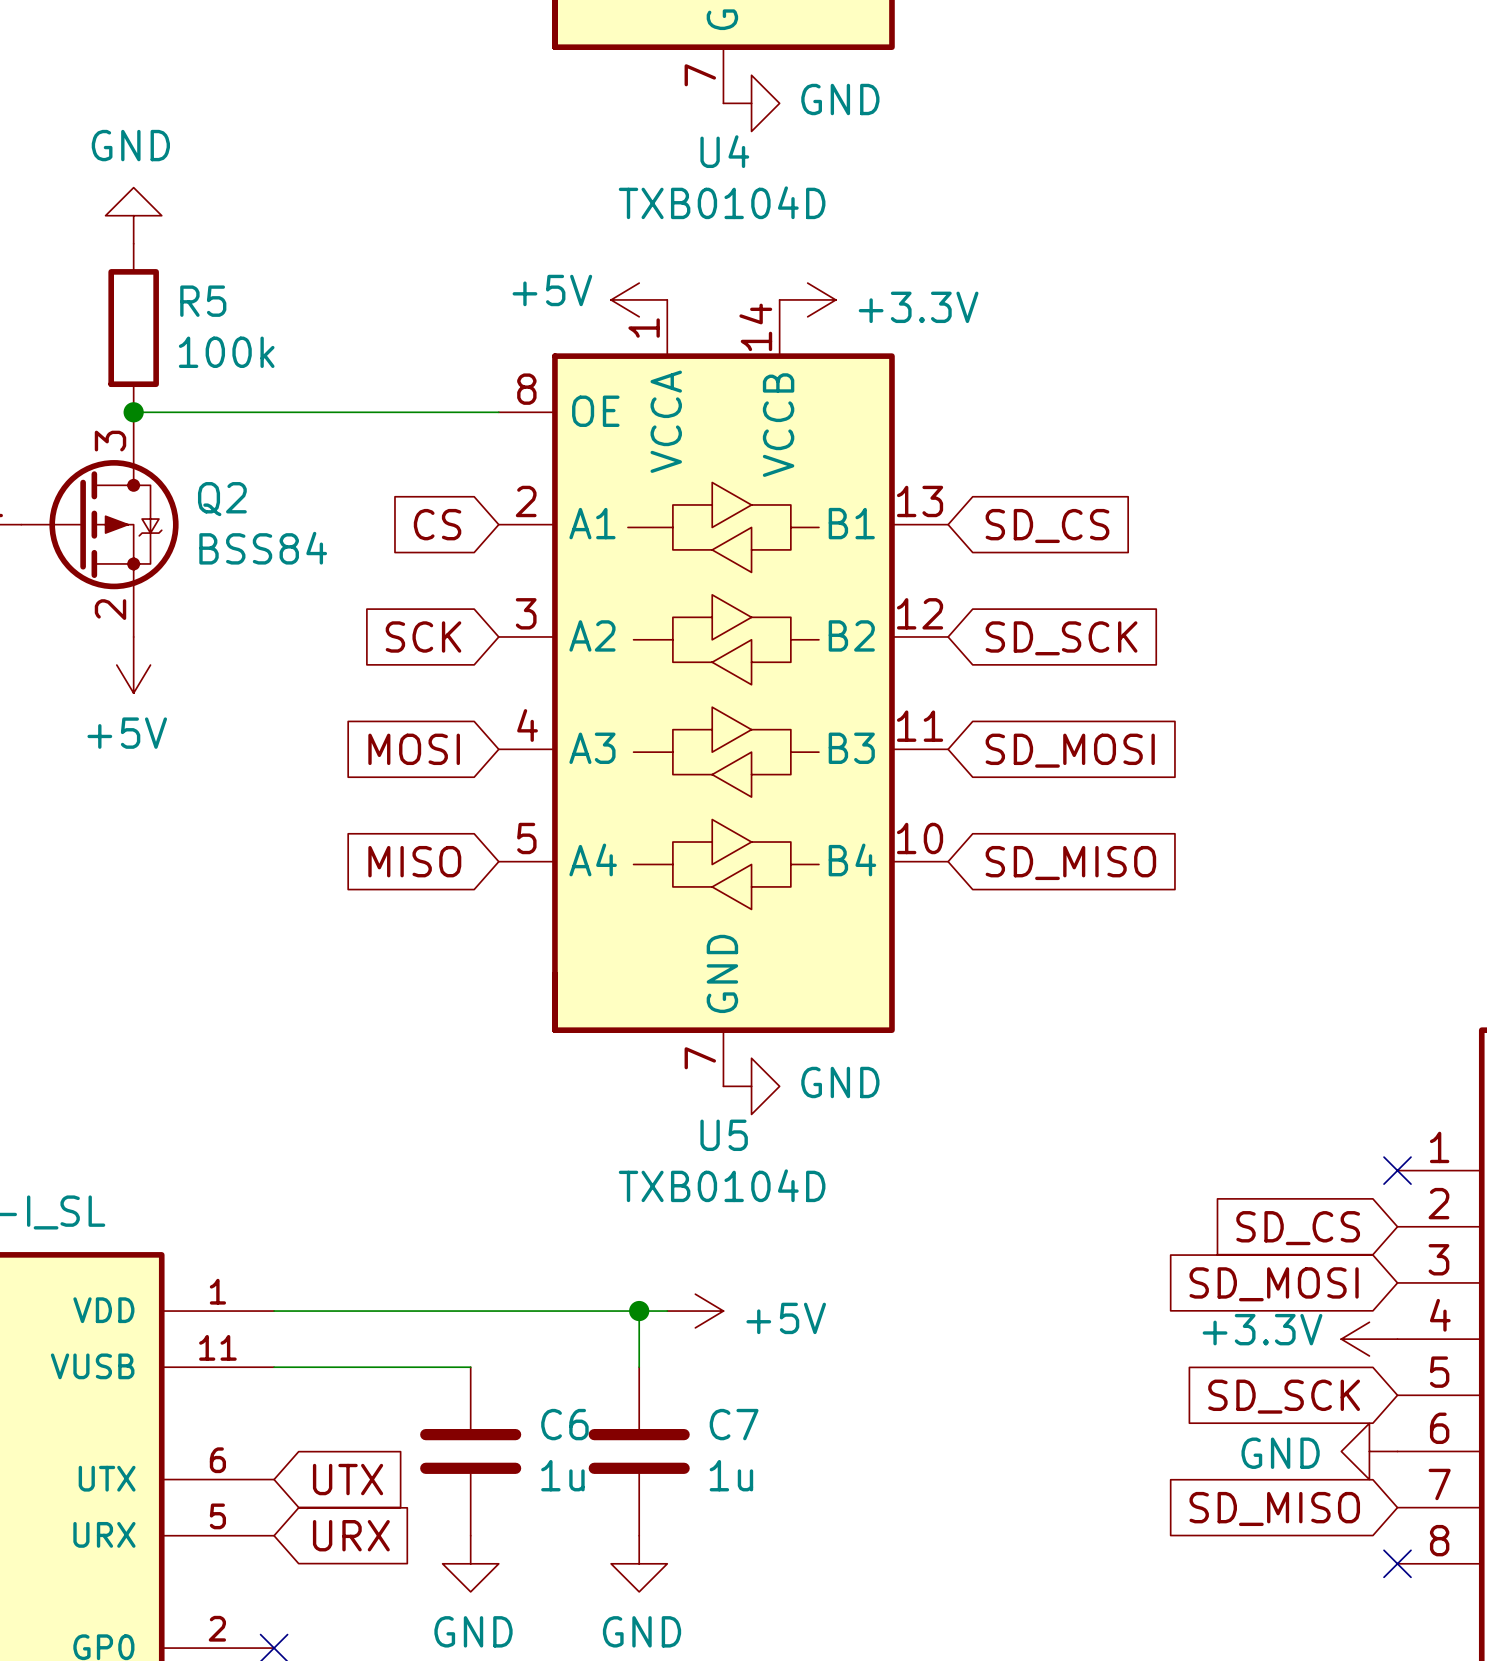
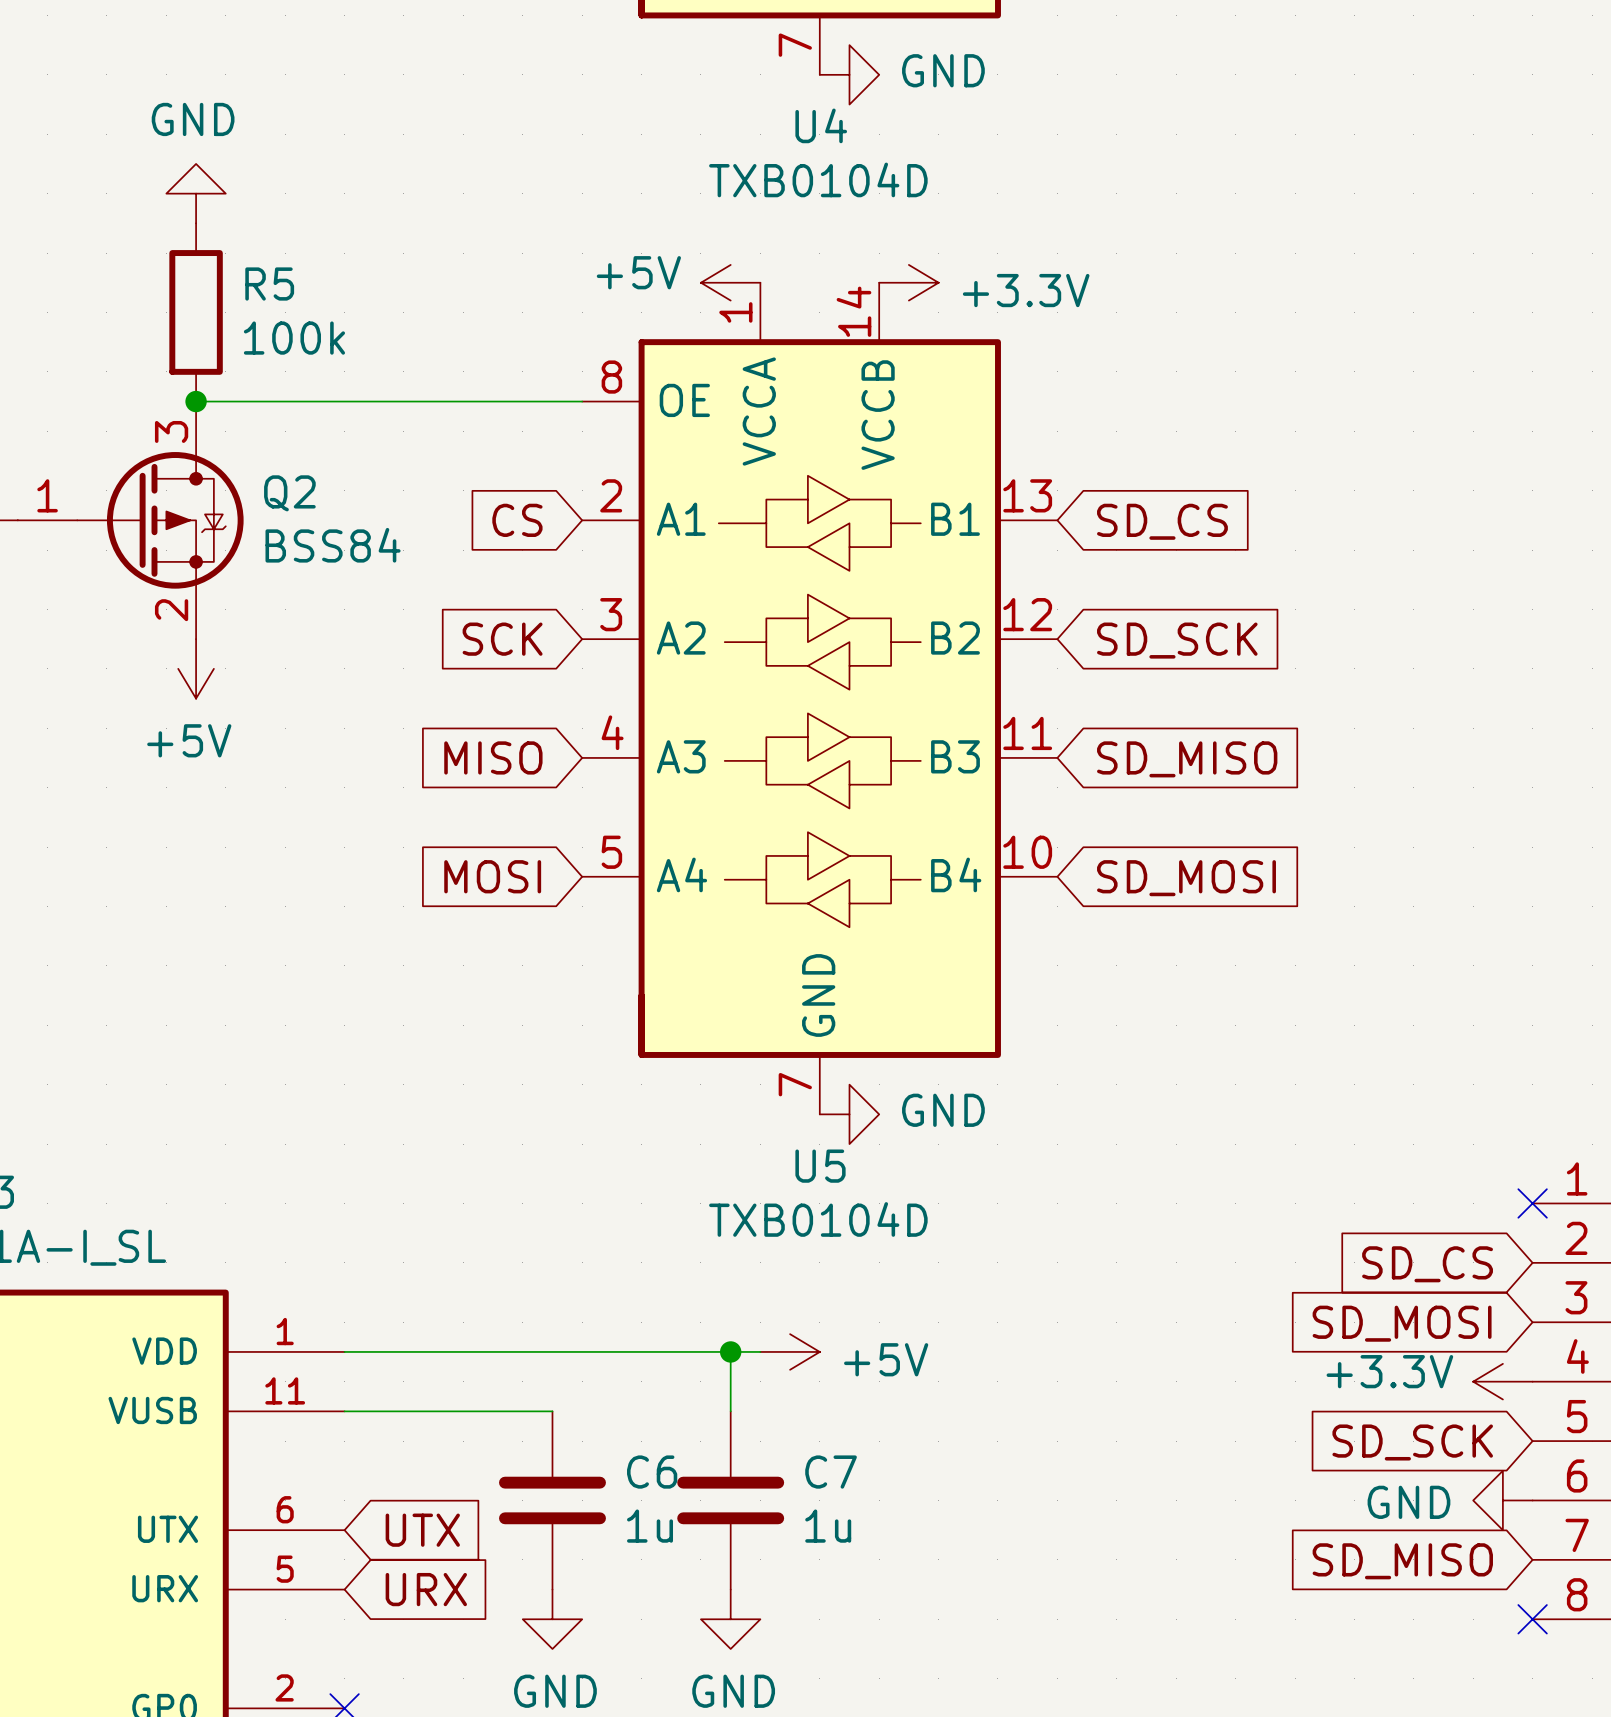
global label: MOSI (414, 749) -> MISO (493, 757)
global label: SD_MOSI (1070, 750) -> SD_MISO (1187, 759)
global label: MISO (414, 861) -> MOSI (492, 876)
global label: SD_MISO (1070, 863) -> SD_MOSI (1186, 878)

